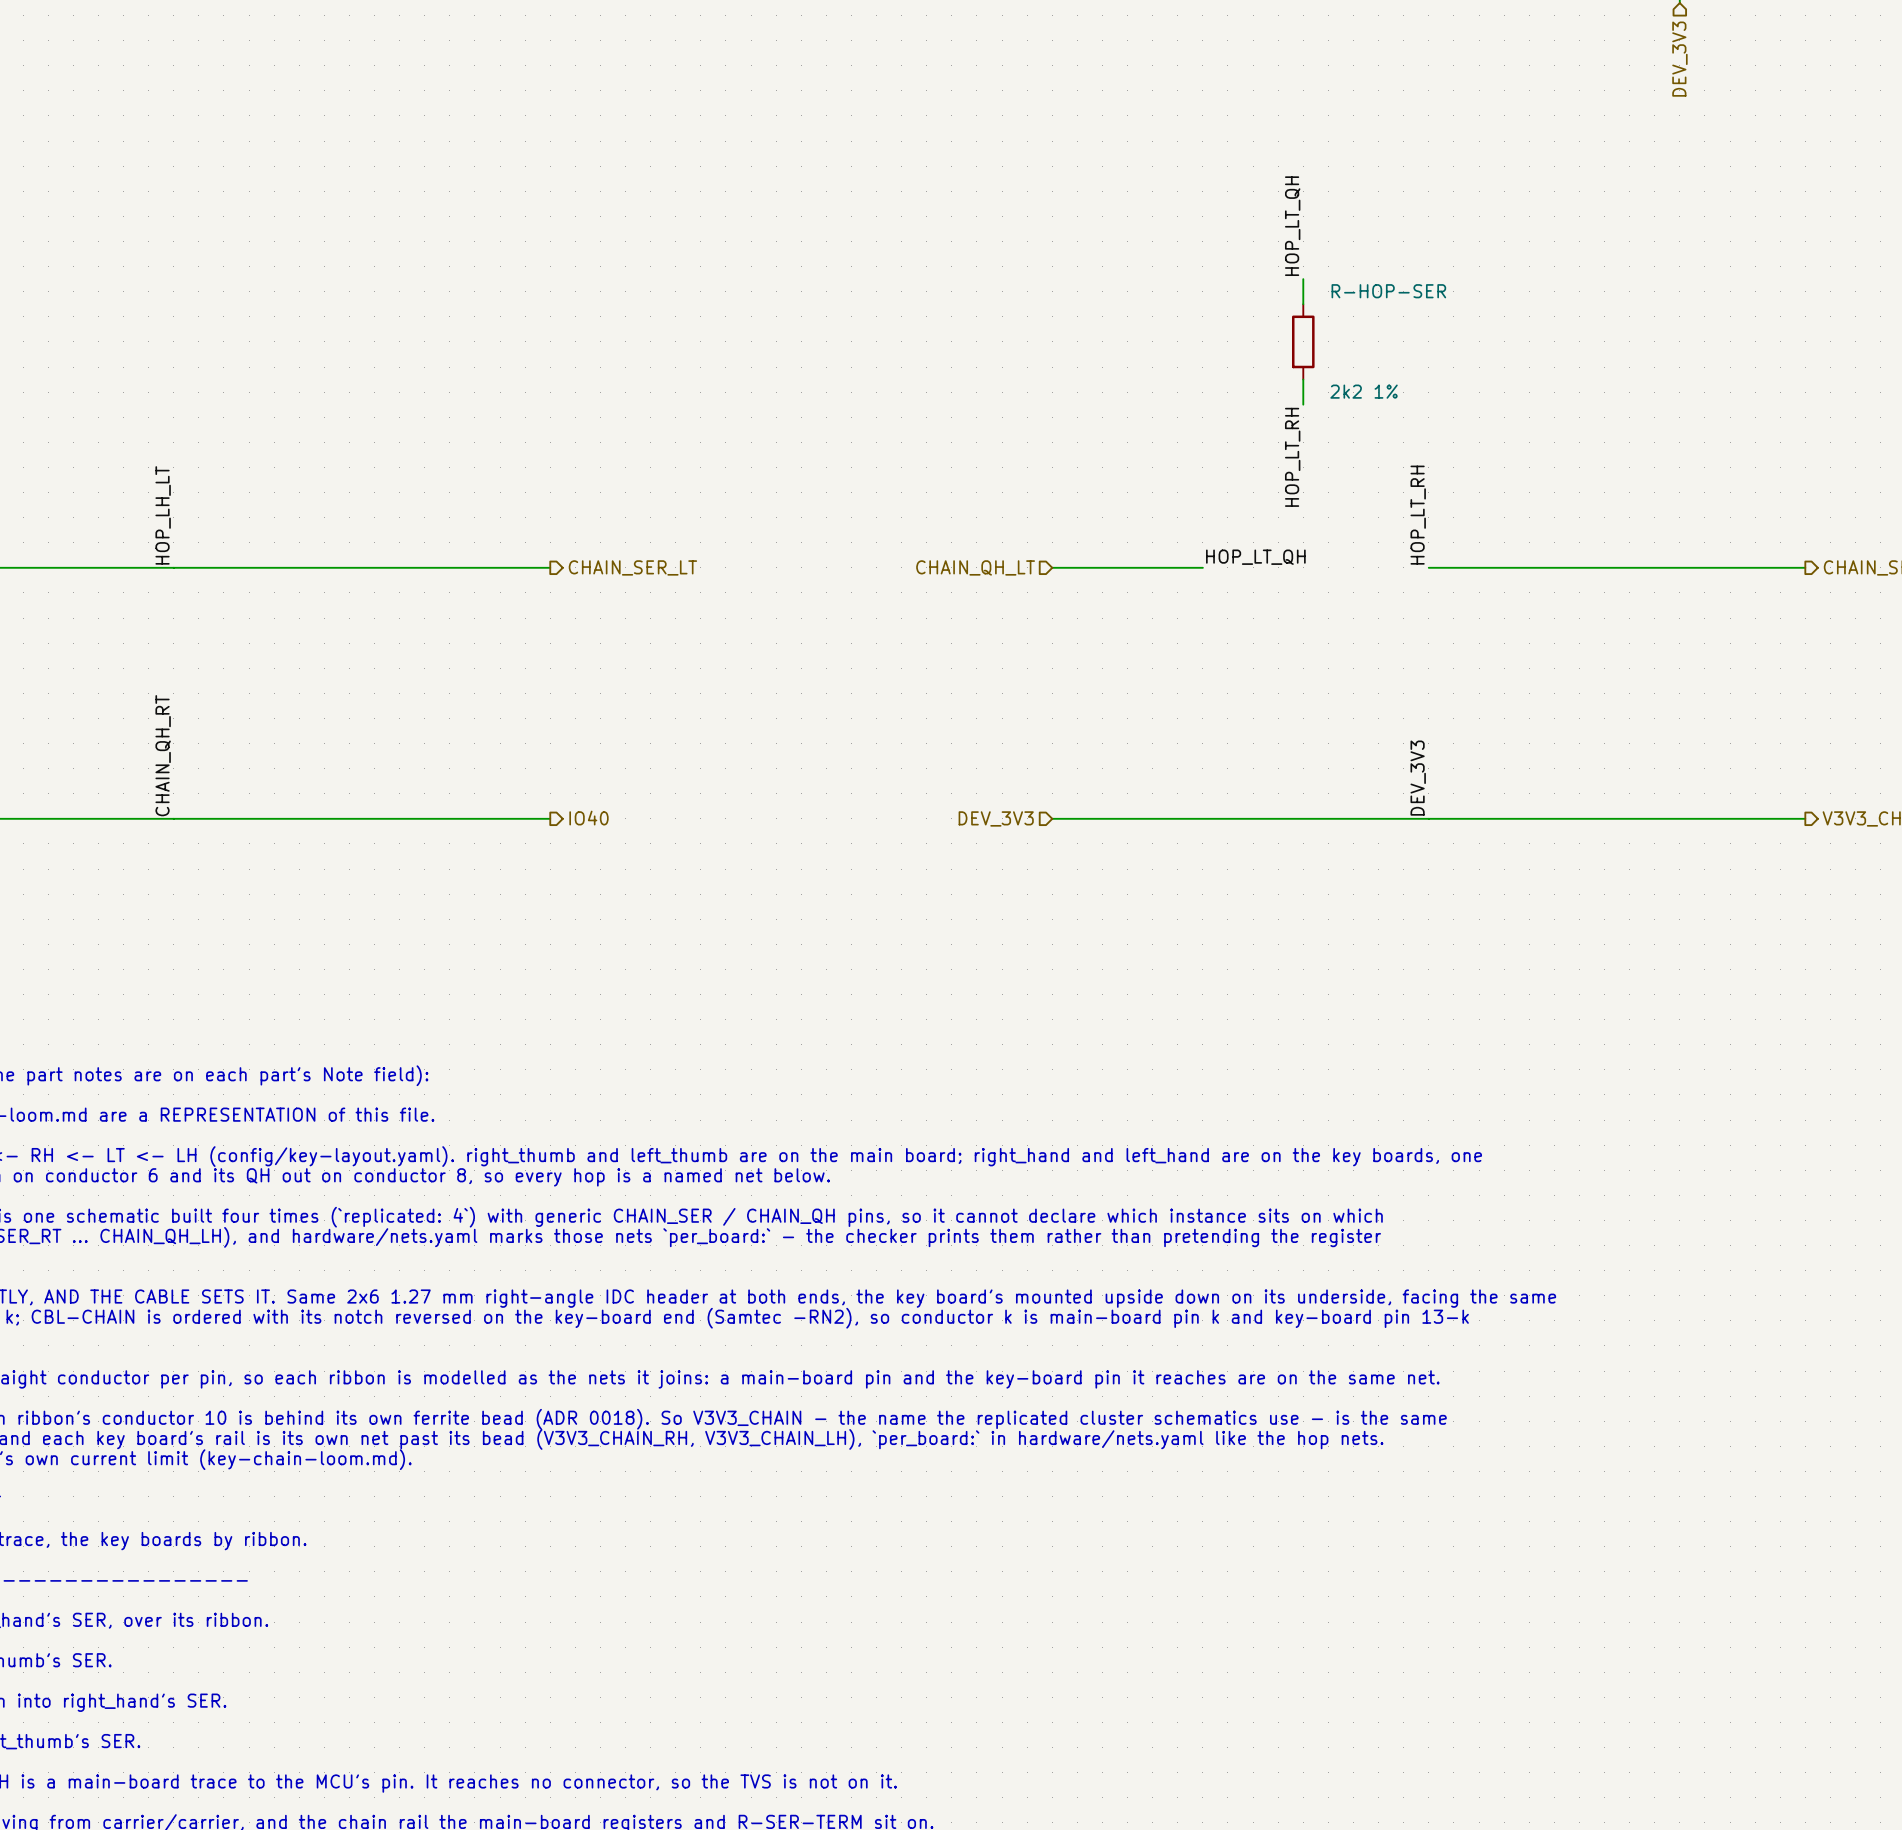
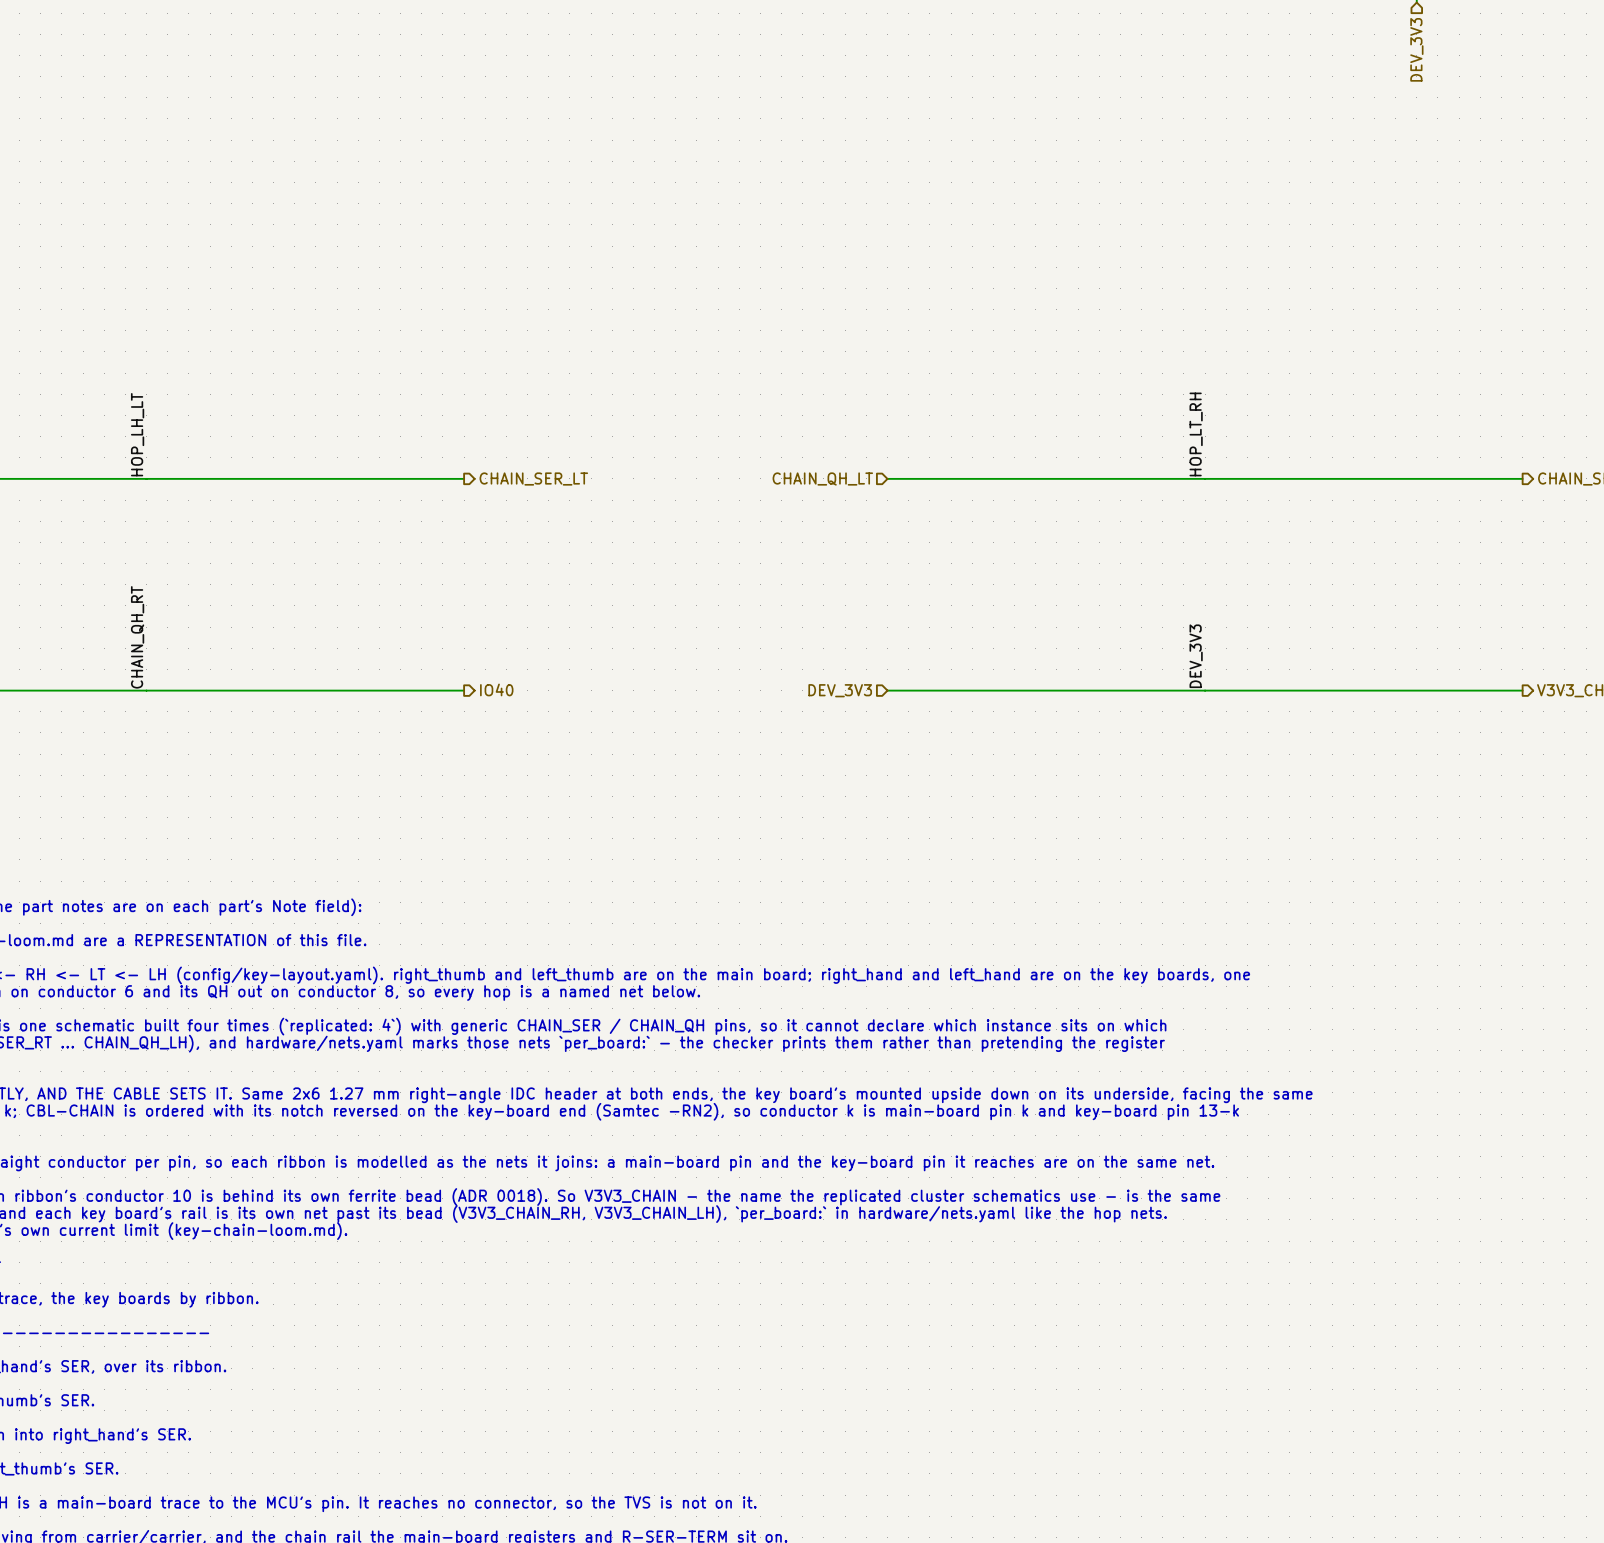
label: HOP_LT_QH (1292, 226) -> none
wire: (1303, 279) (1303, 304) -> none
R-HOP-SER: 2k2 1% (1303, 341) -> none
wire: (1303, 379) (1303, 404) -> none
label: HOP_LT_RH (1292, 457) -> none
label: HOP_LT_QH (1255, 557) -> none
wire: none -> (1014, 478) (1205, 478)

